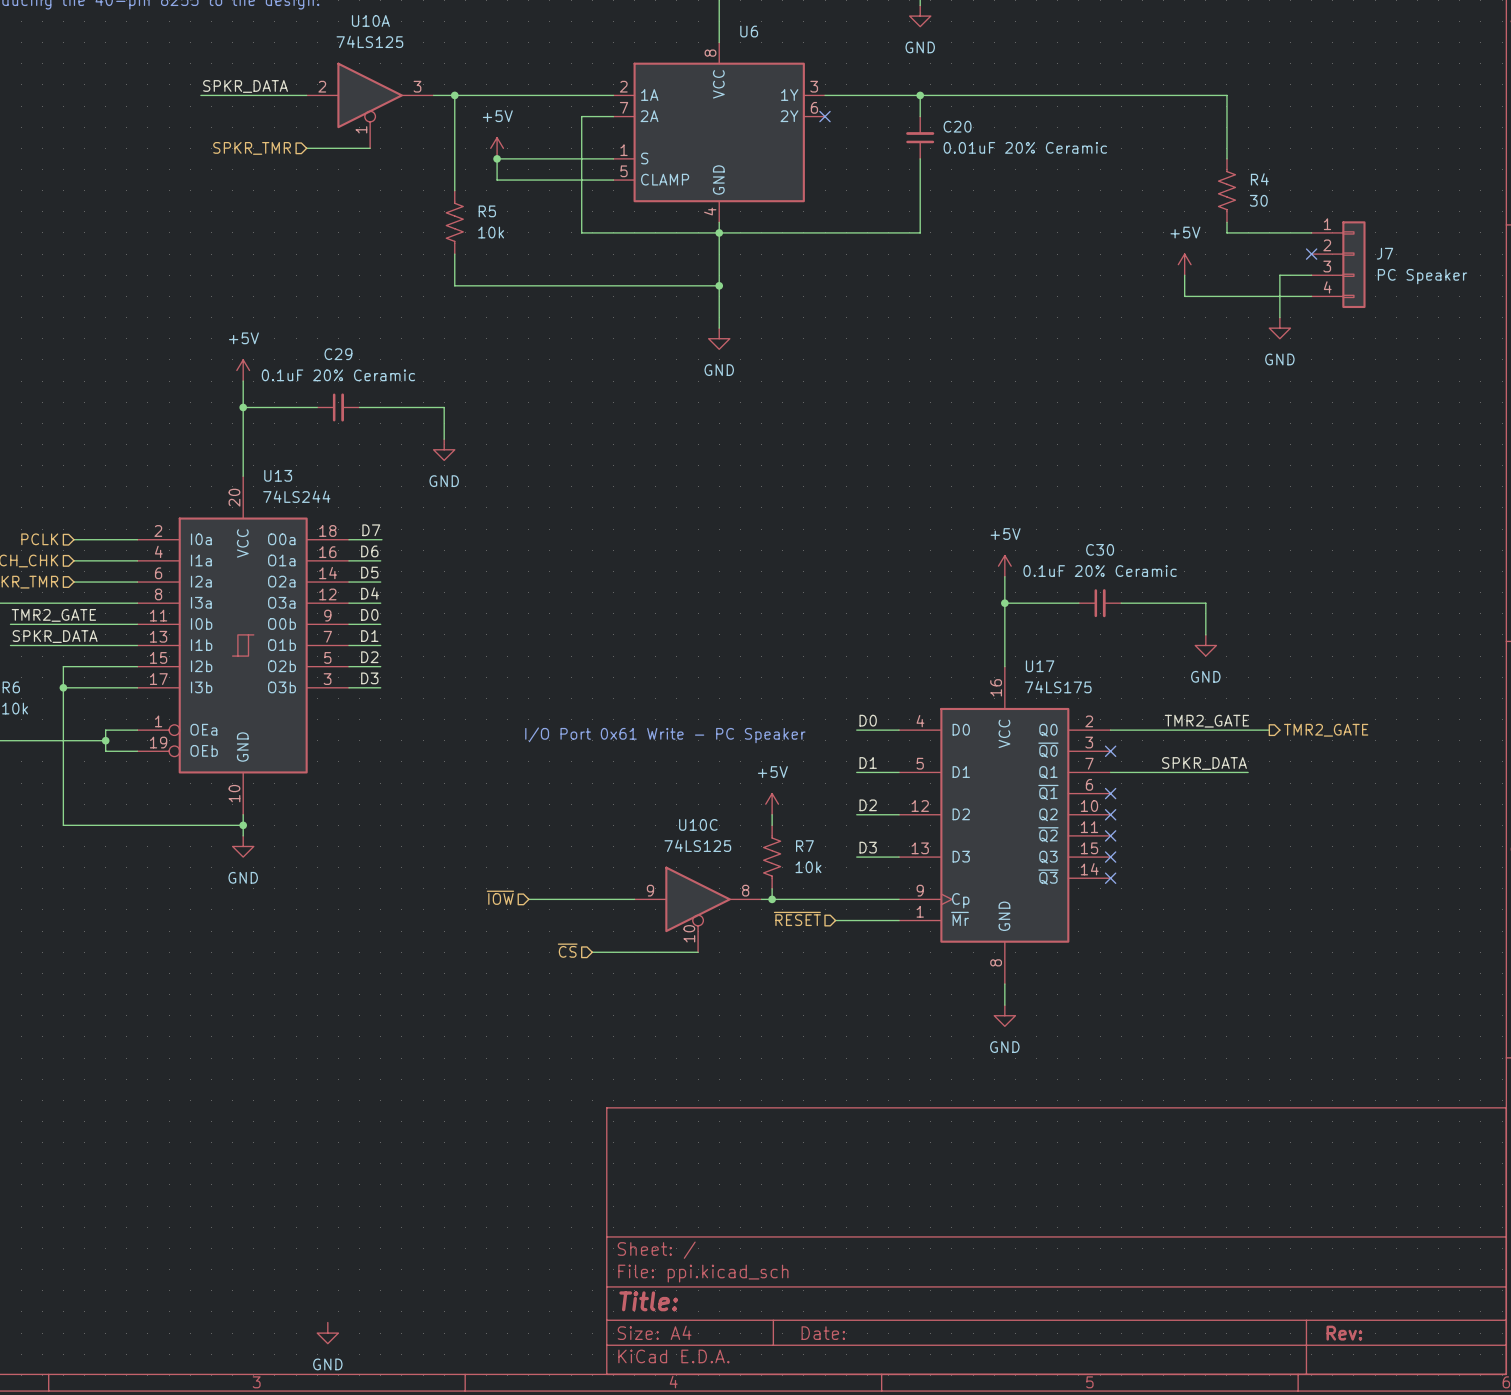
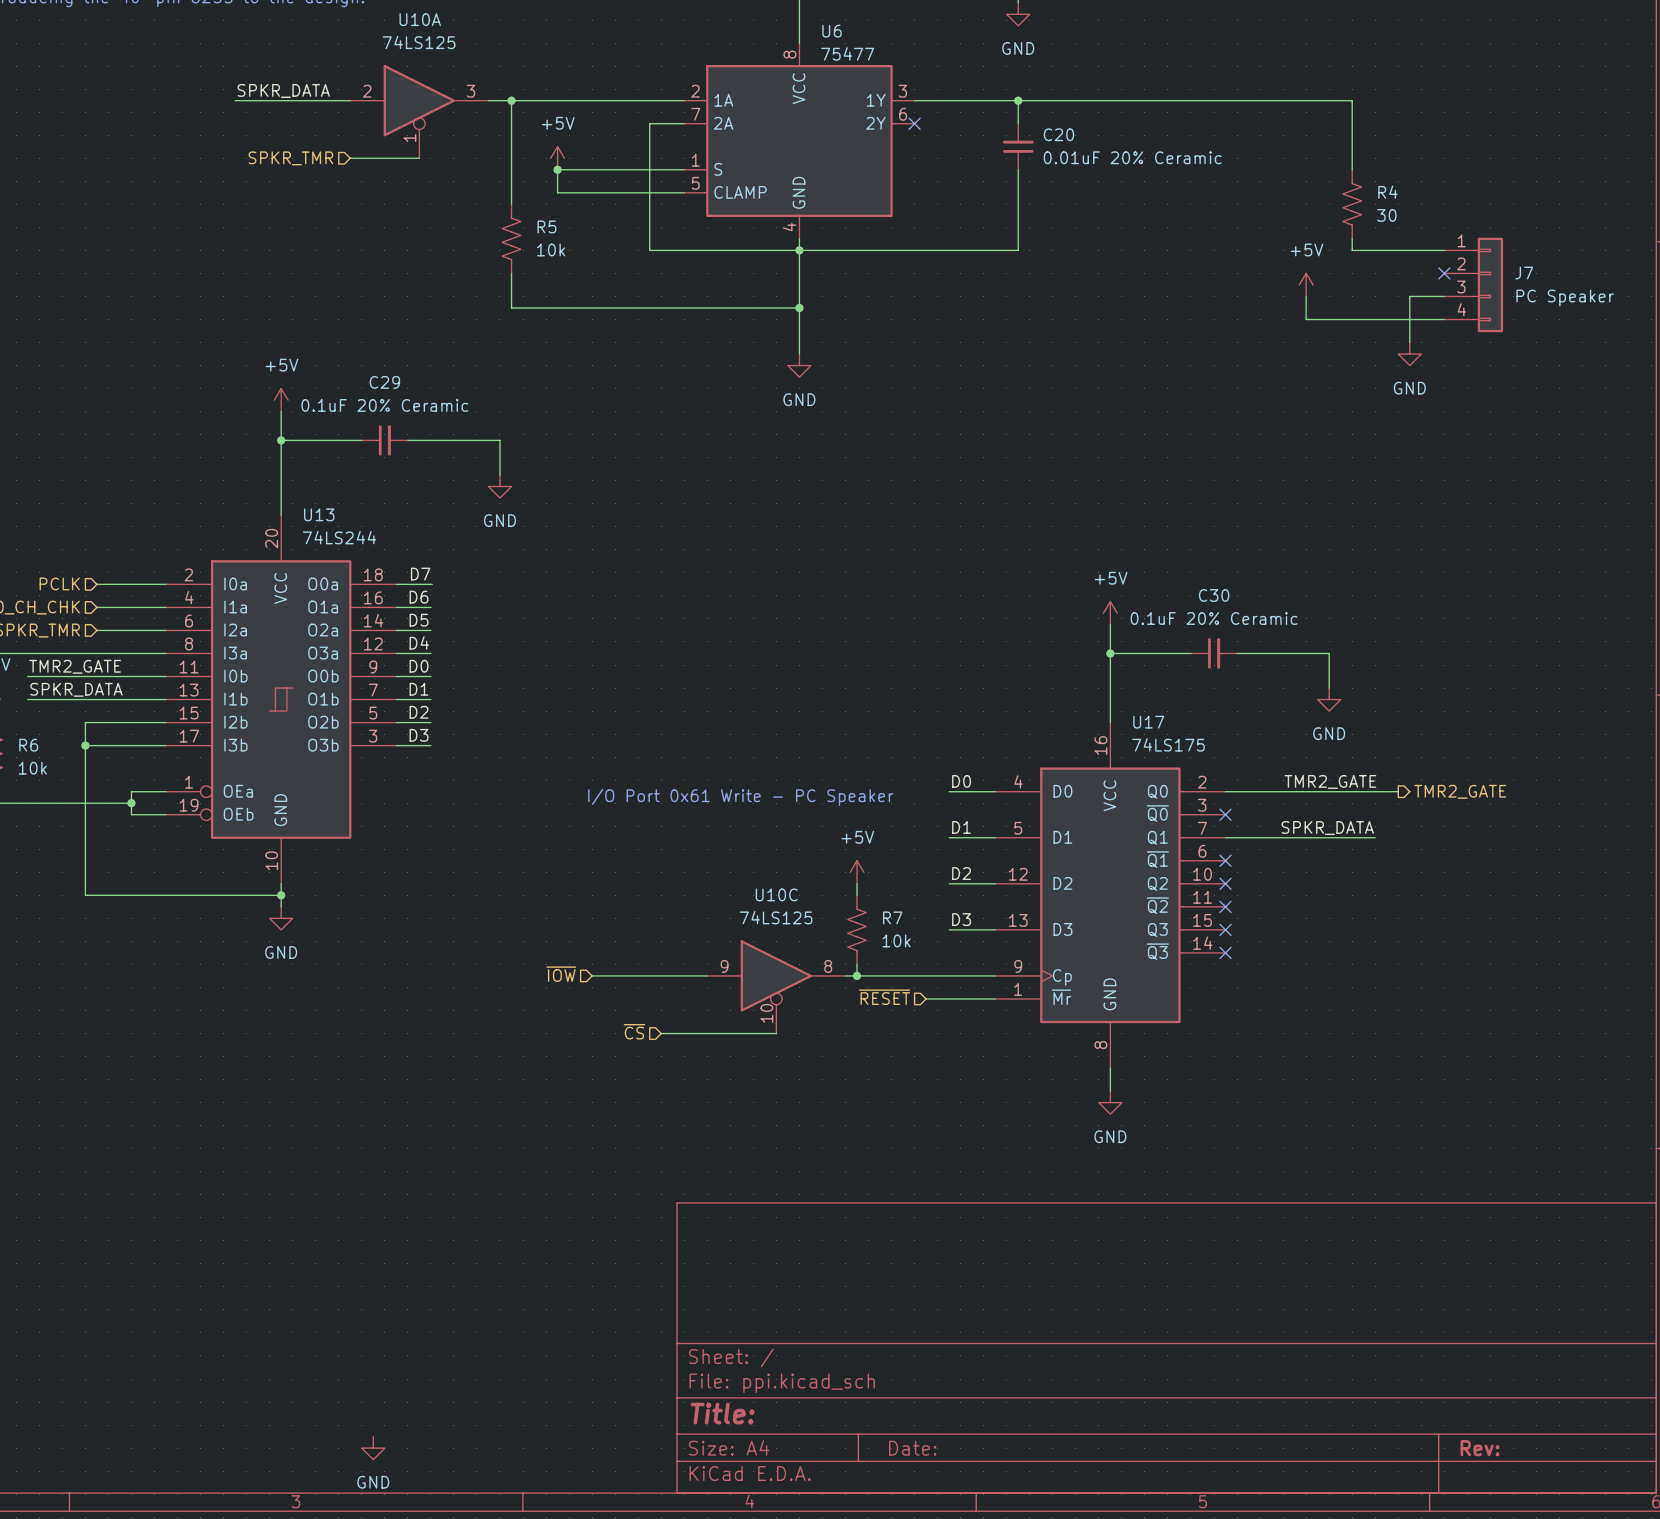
U6 value: none -> 75477 (847, 53)

